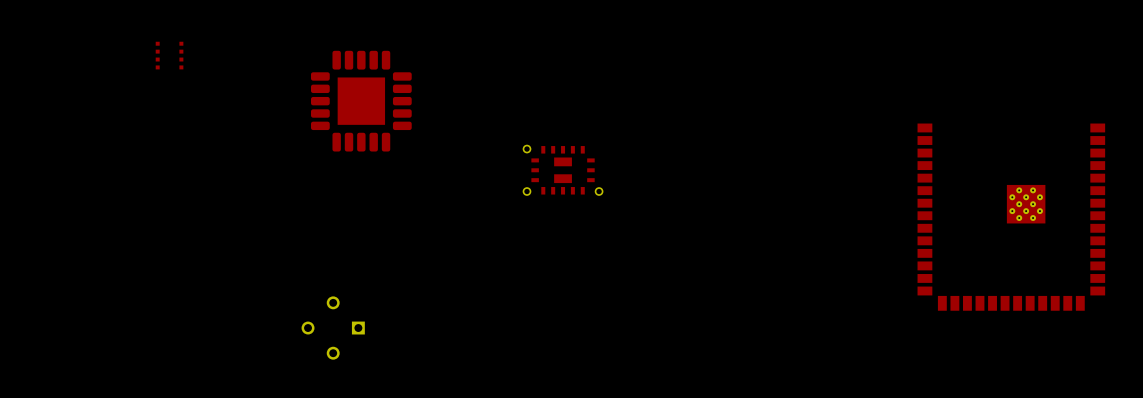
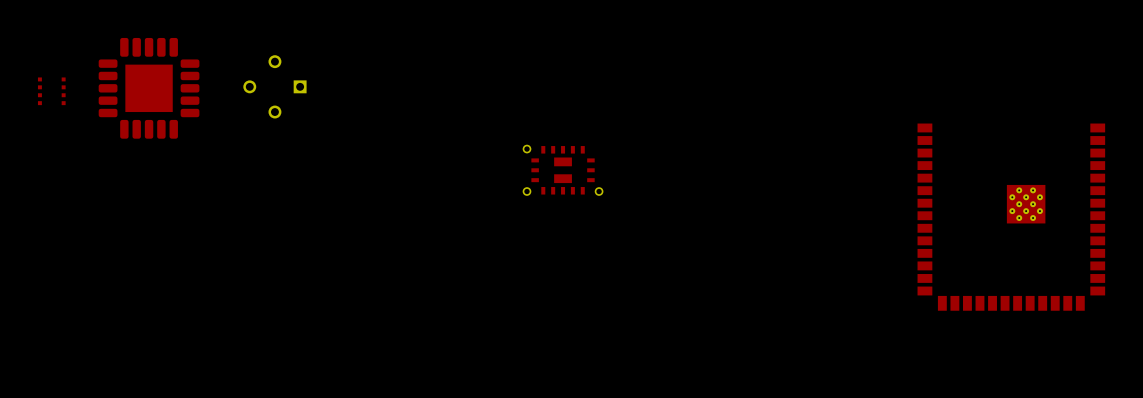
part position: (169, 55) -> (51, 91)
part: none -> (274, 86)
part position: (361, 101) -> (149, 88)
part: (333, 328) -> none

